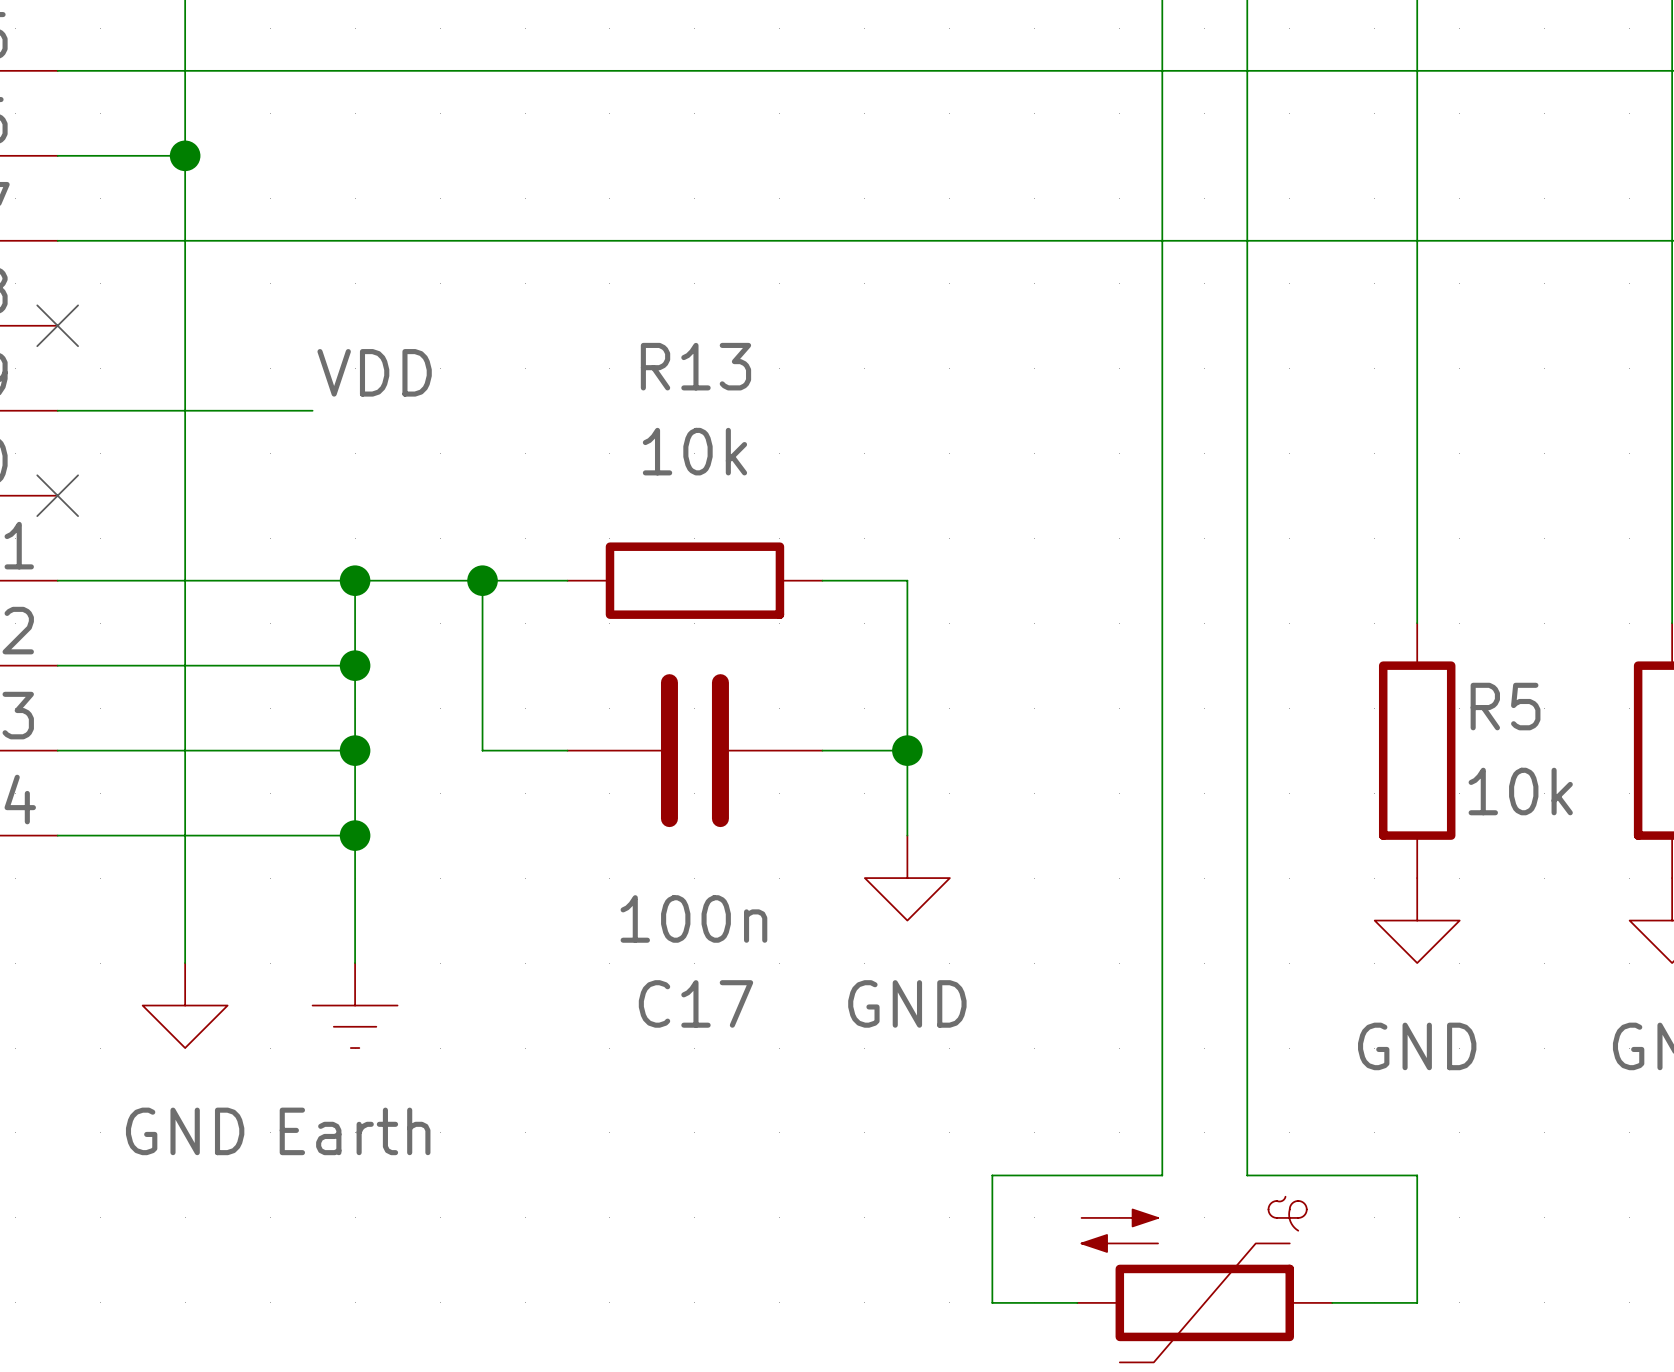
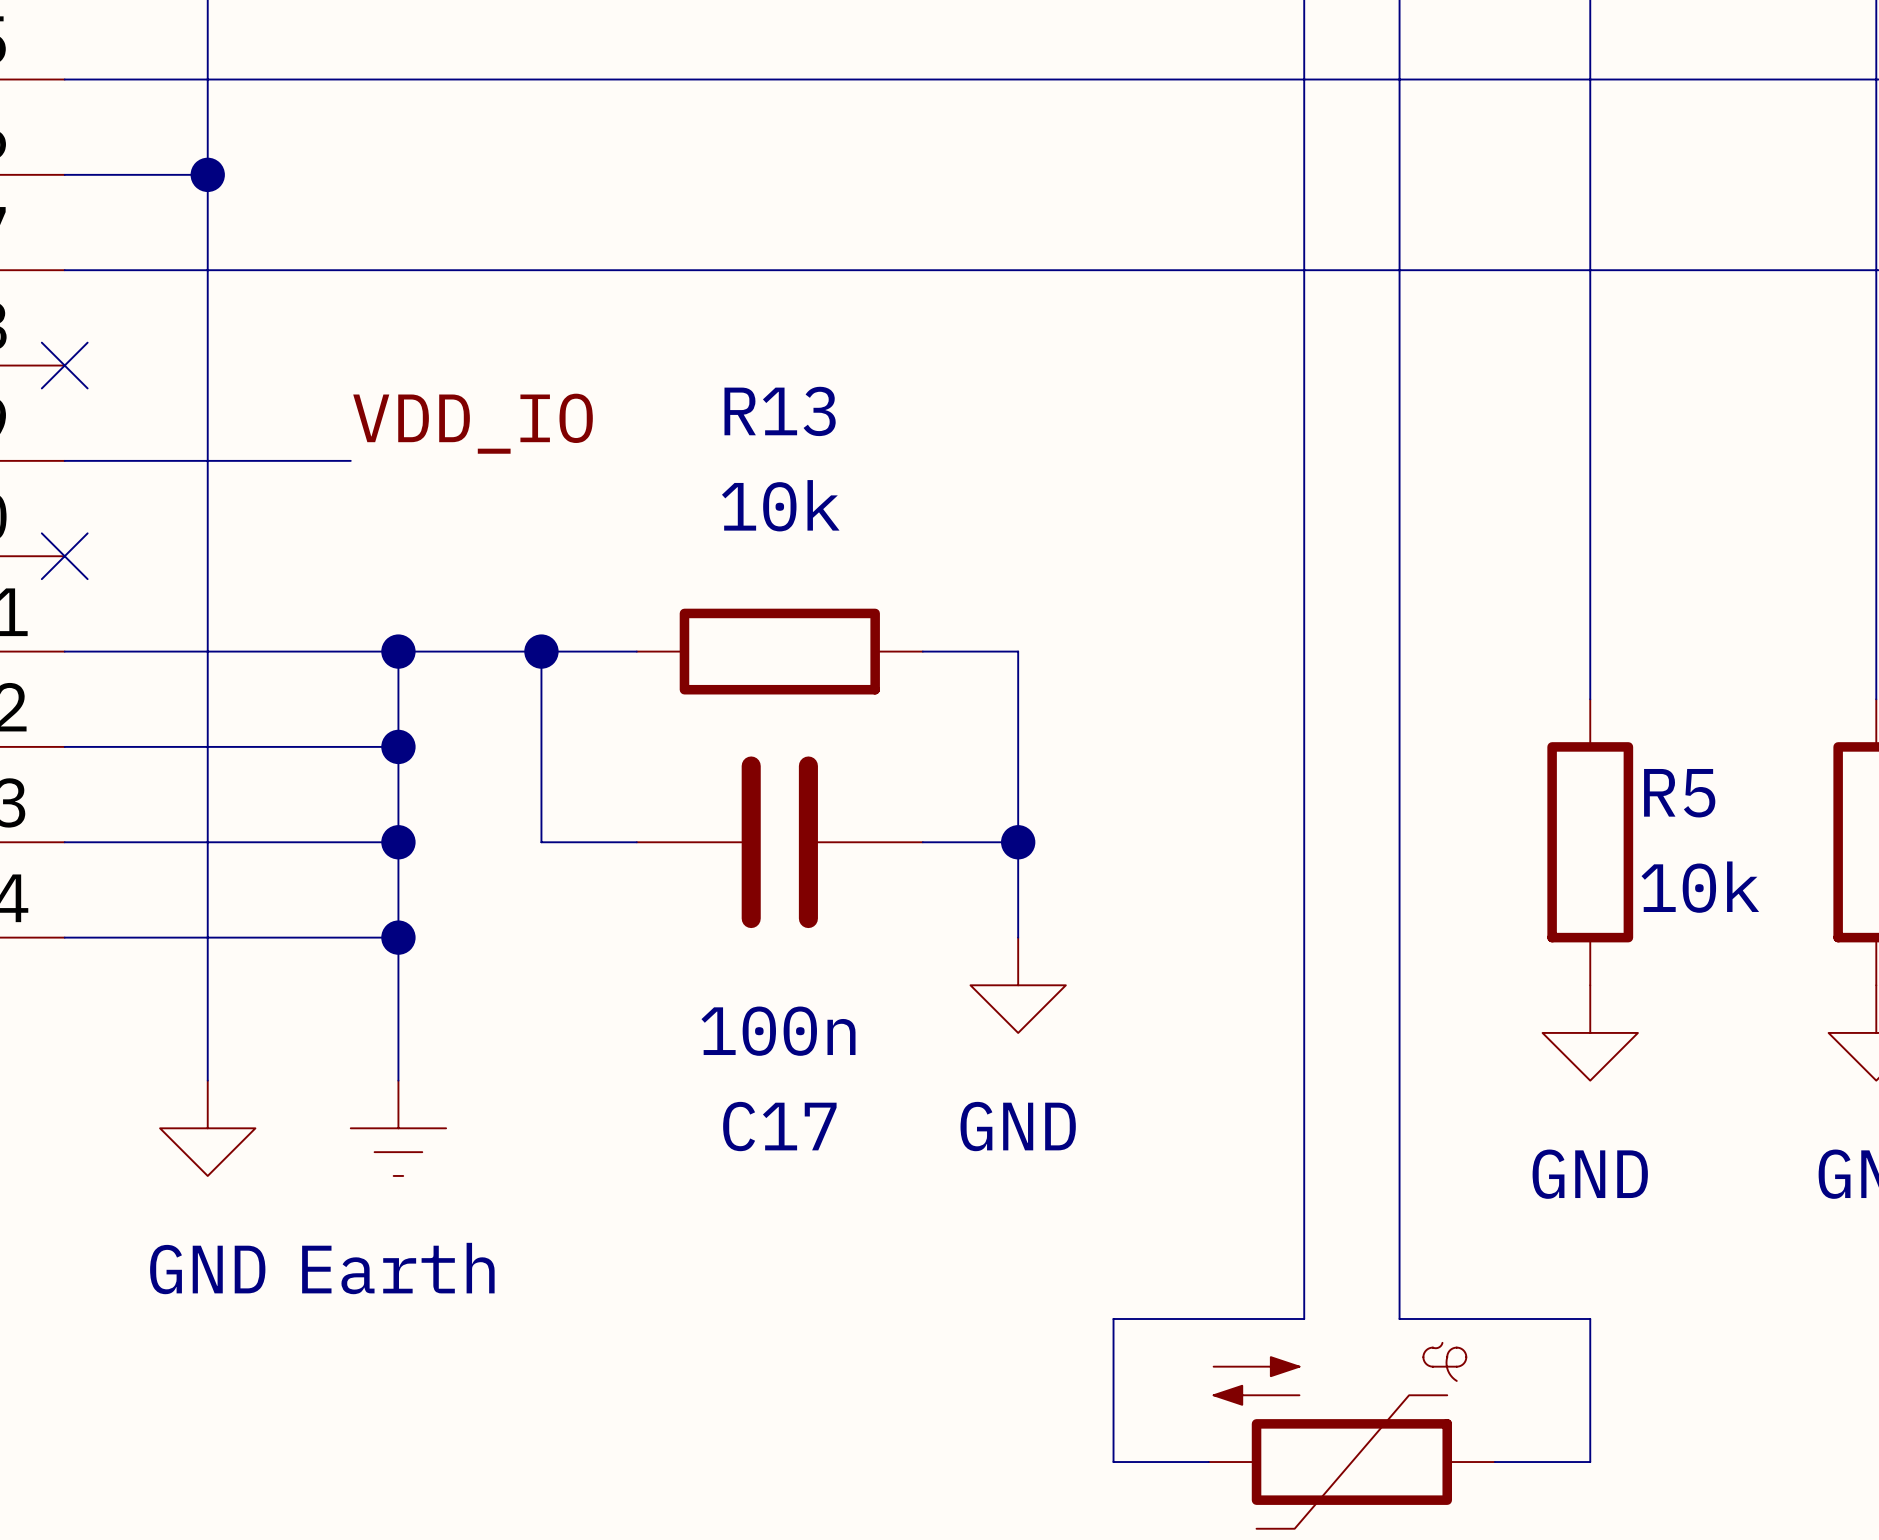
label: VDD (374, 372) -> VDD_IO (473, 423)

